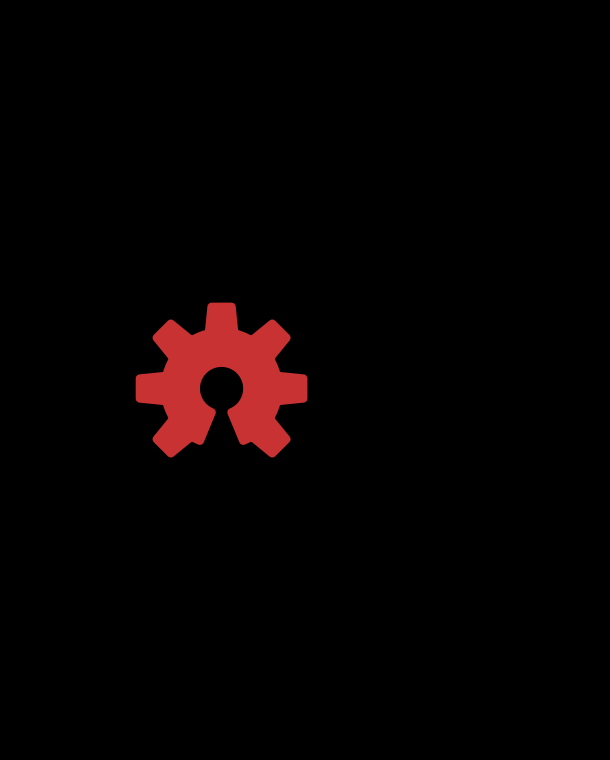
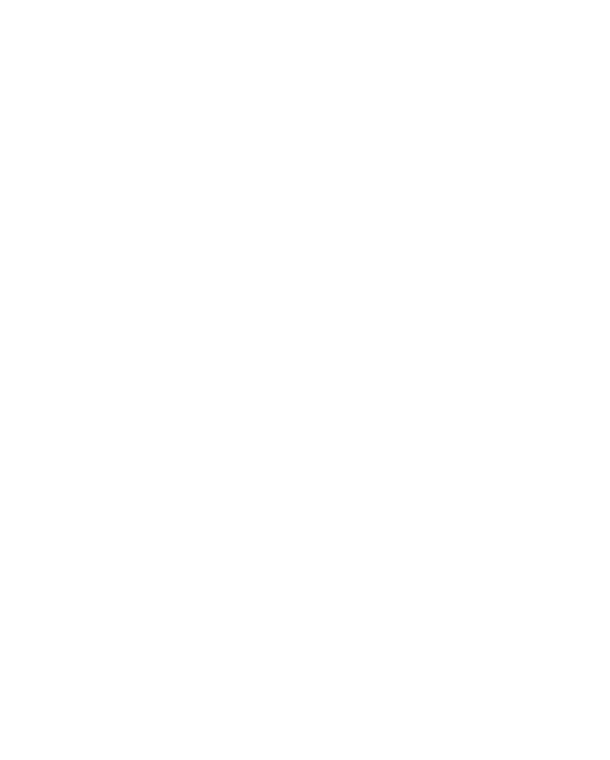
drawing: [135, 302, 308, 458] -> none

